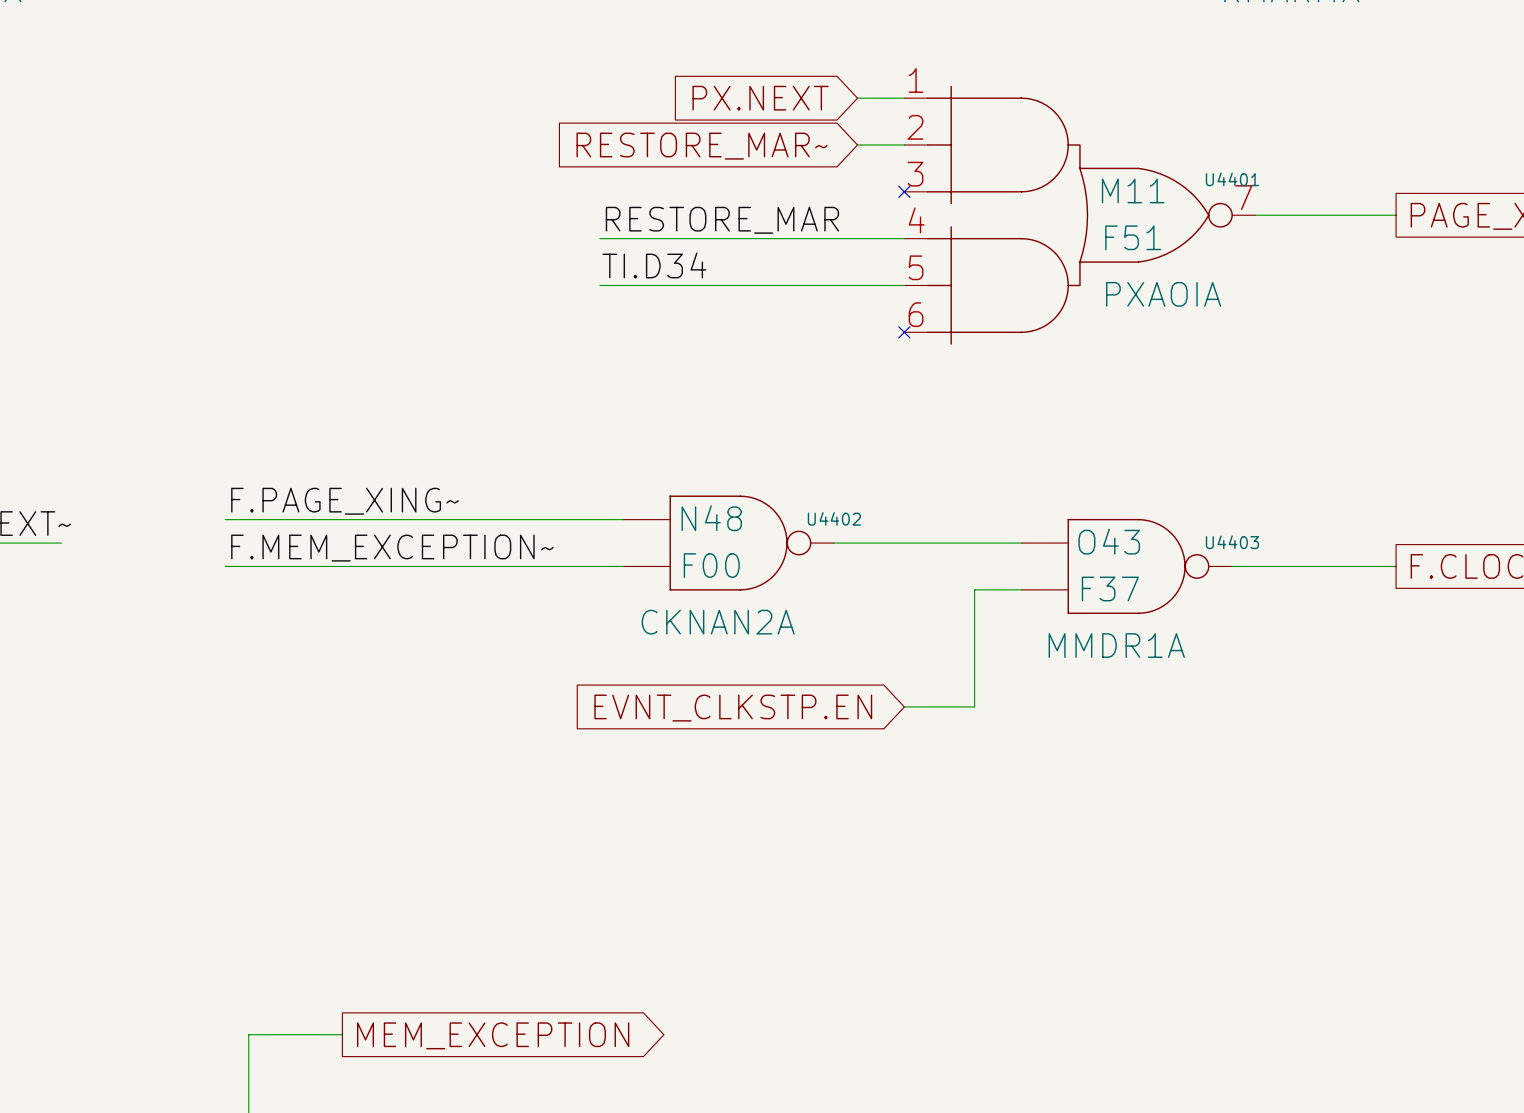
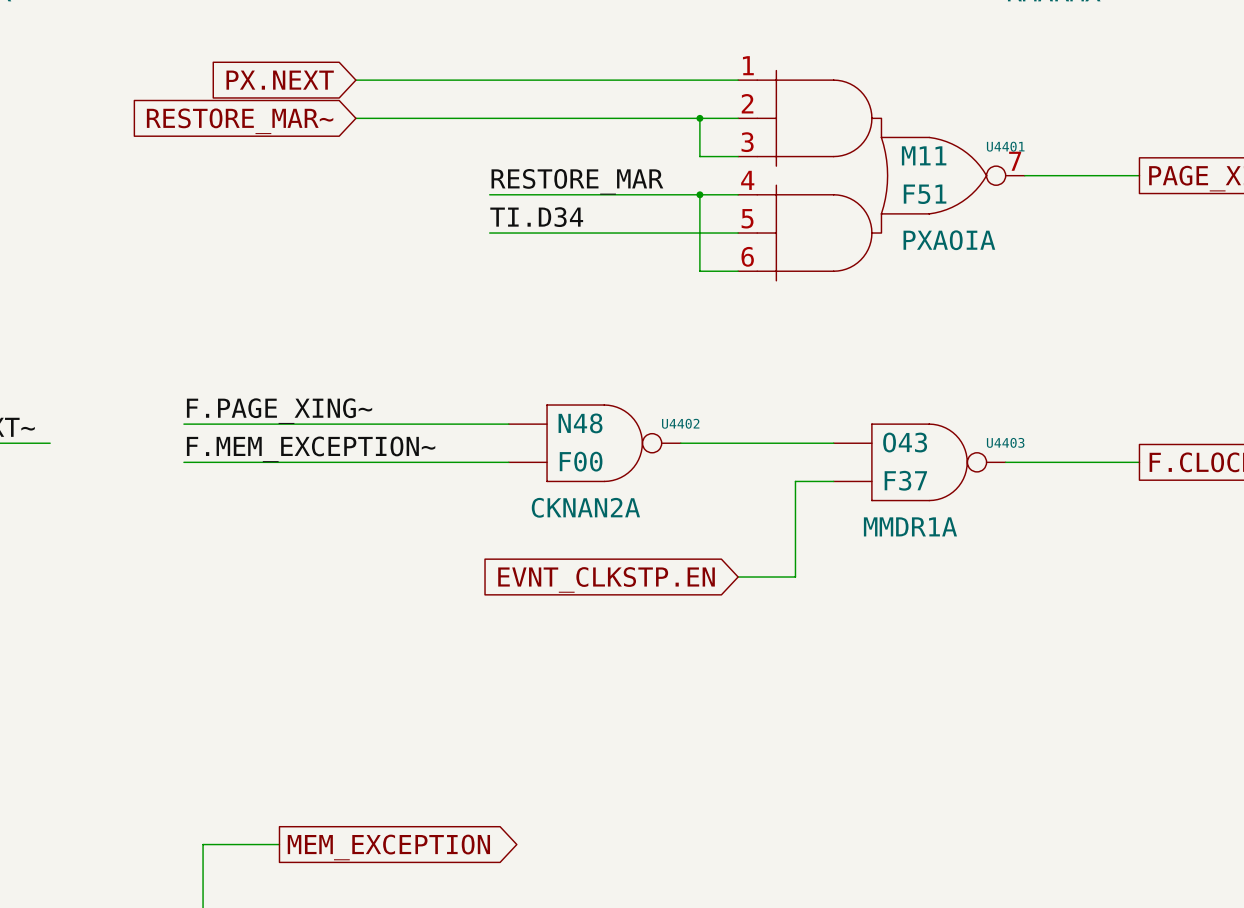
global label: none -> PX.NEXT (280, 80)
wire: none -> (355, 80) (699, 80)
global label: PX.NEXT (760, 98) -> none
wire: none -> (355, 118) (699, 118) (699, 156) (738, 156)
junction: none -> (699, 118)
global label: none -> RESTORE_MAR~ (240, 121)
global label: RESTORE_MAR~ (702, 146) -> none
no-connect mark: (904, 191) -> none
wire: none -> (699, 194) (699, 271) (738, 271)
junction: none -> (699, 194)
no-connect mark: (904, 332) -> none

